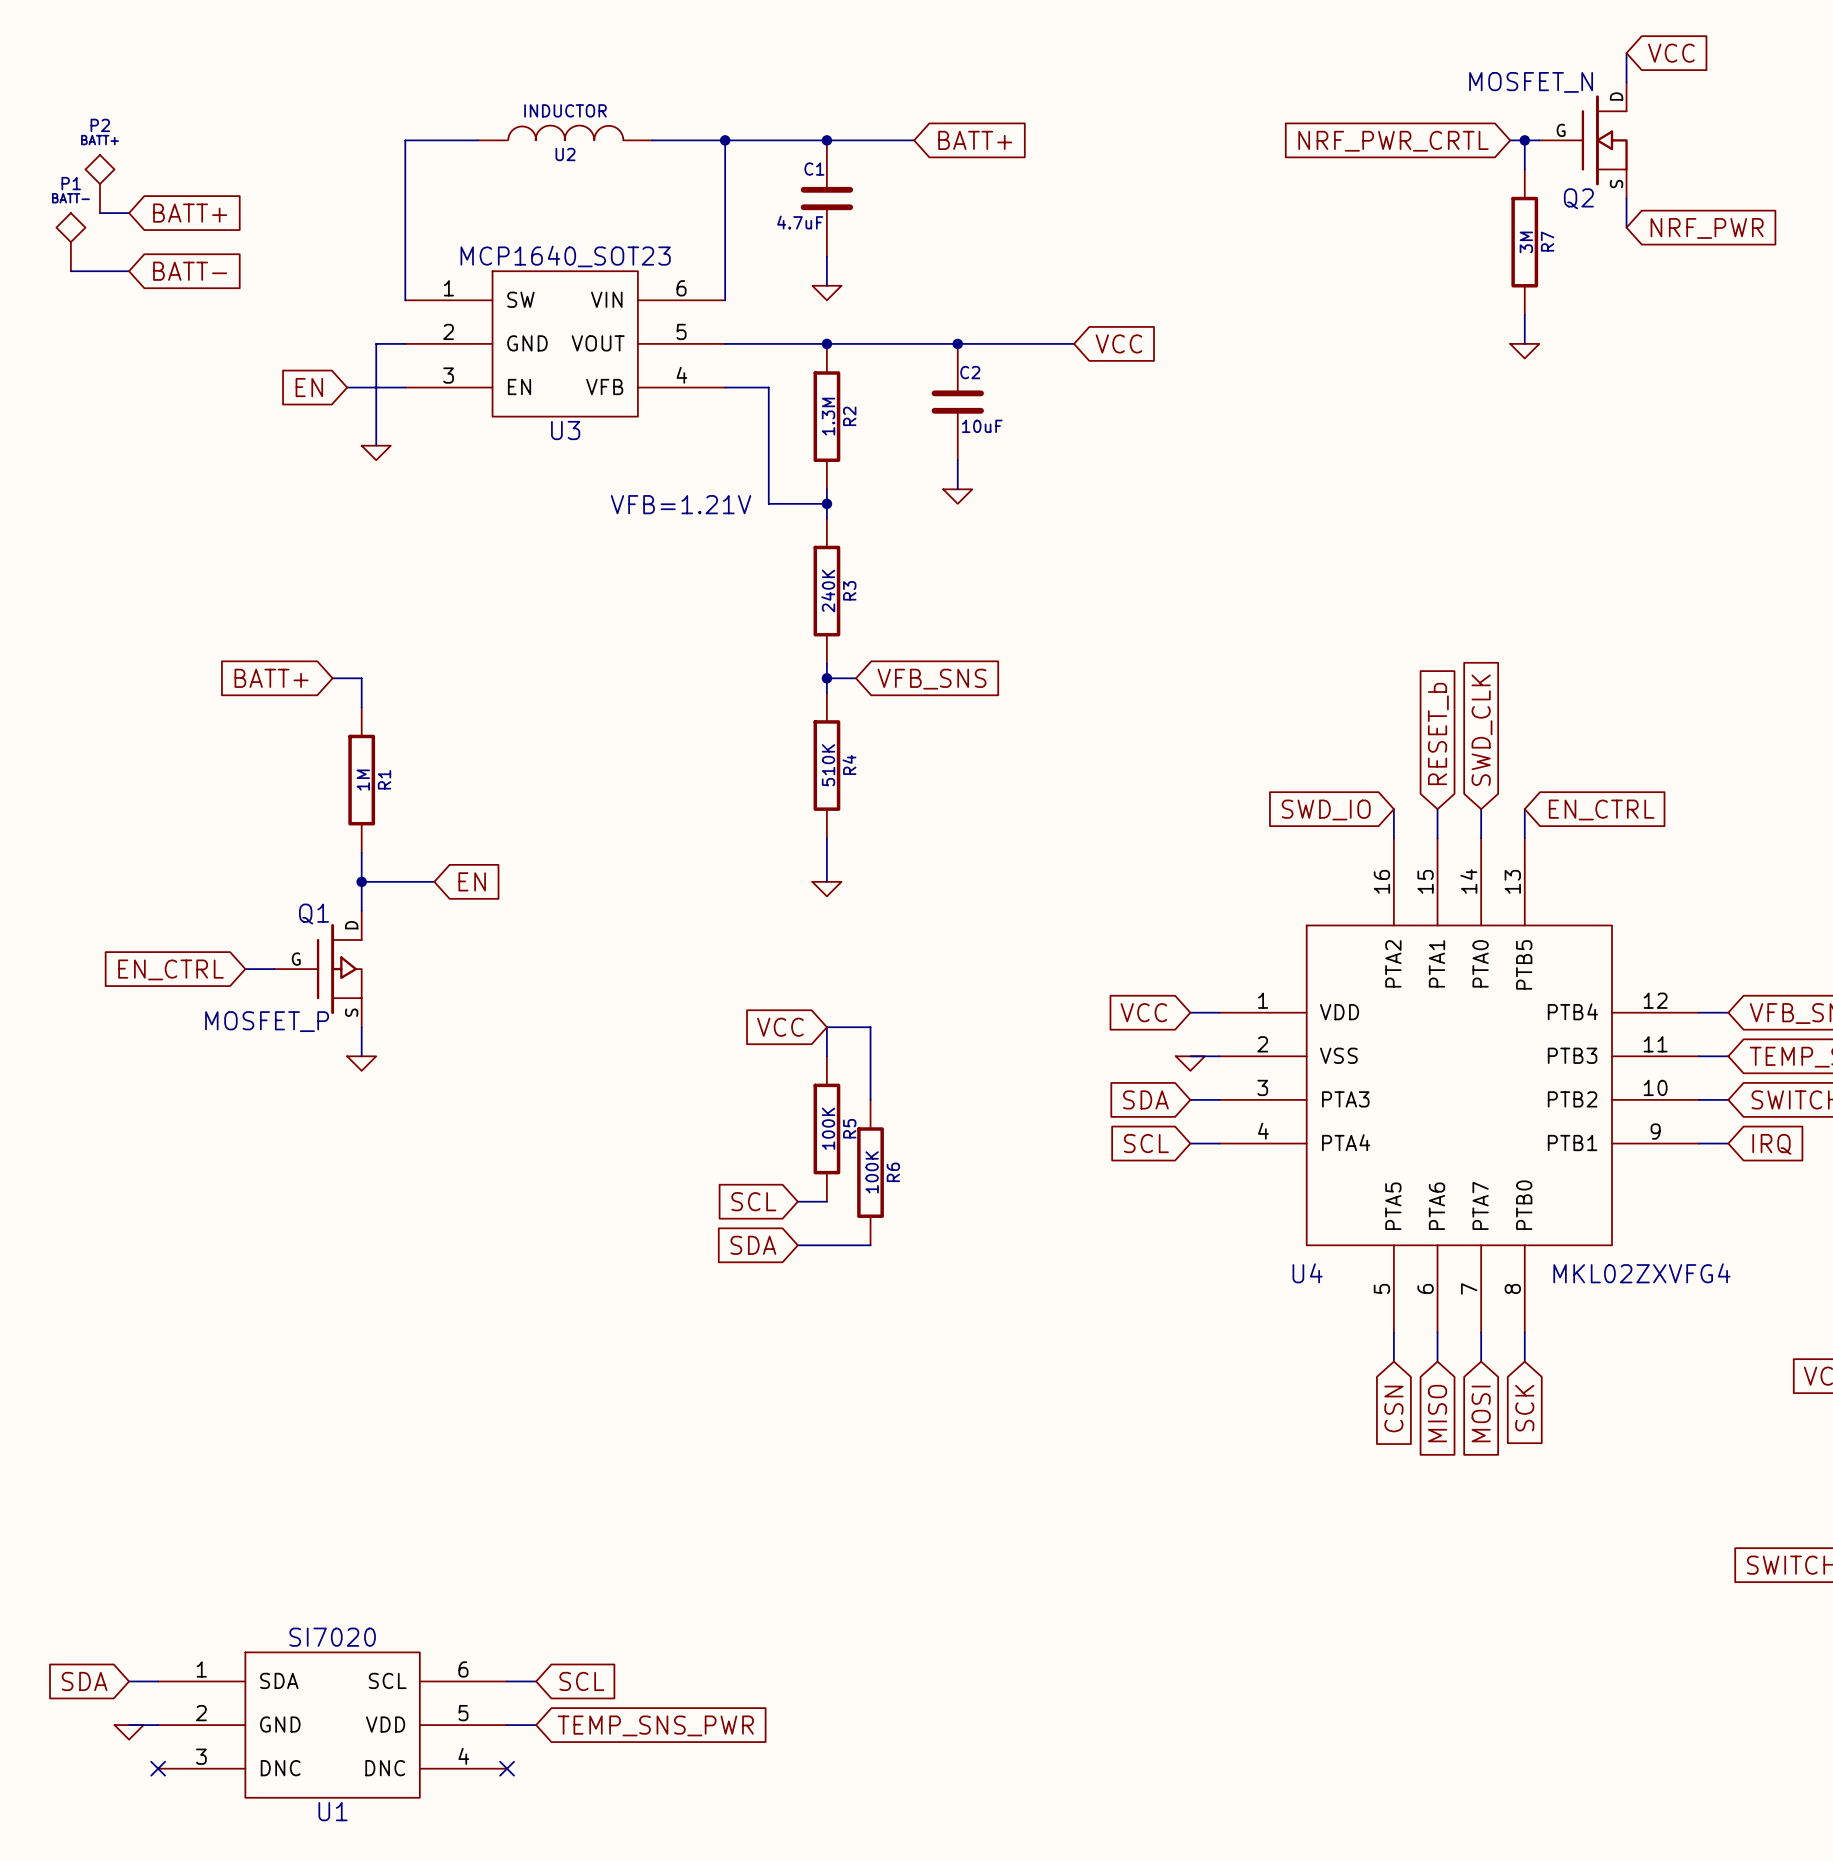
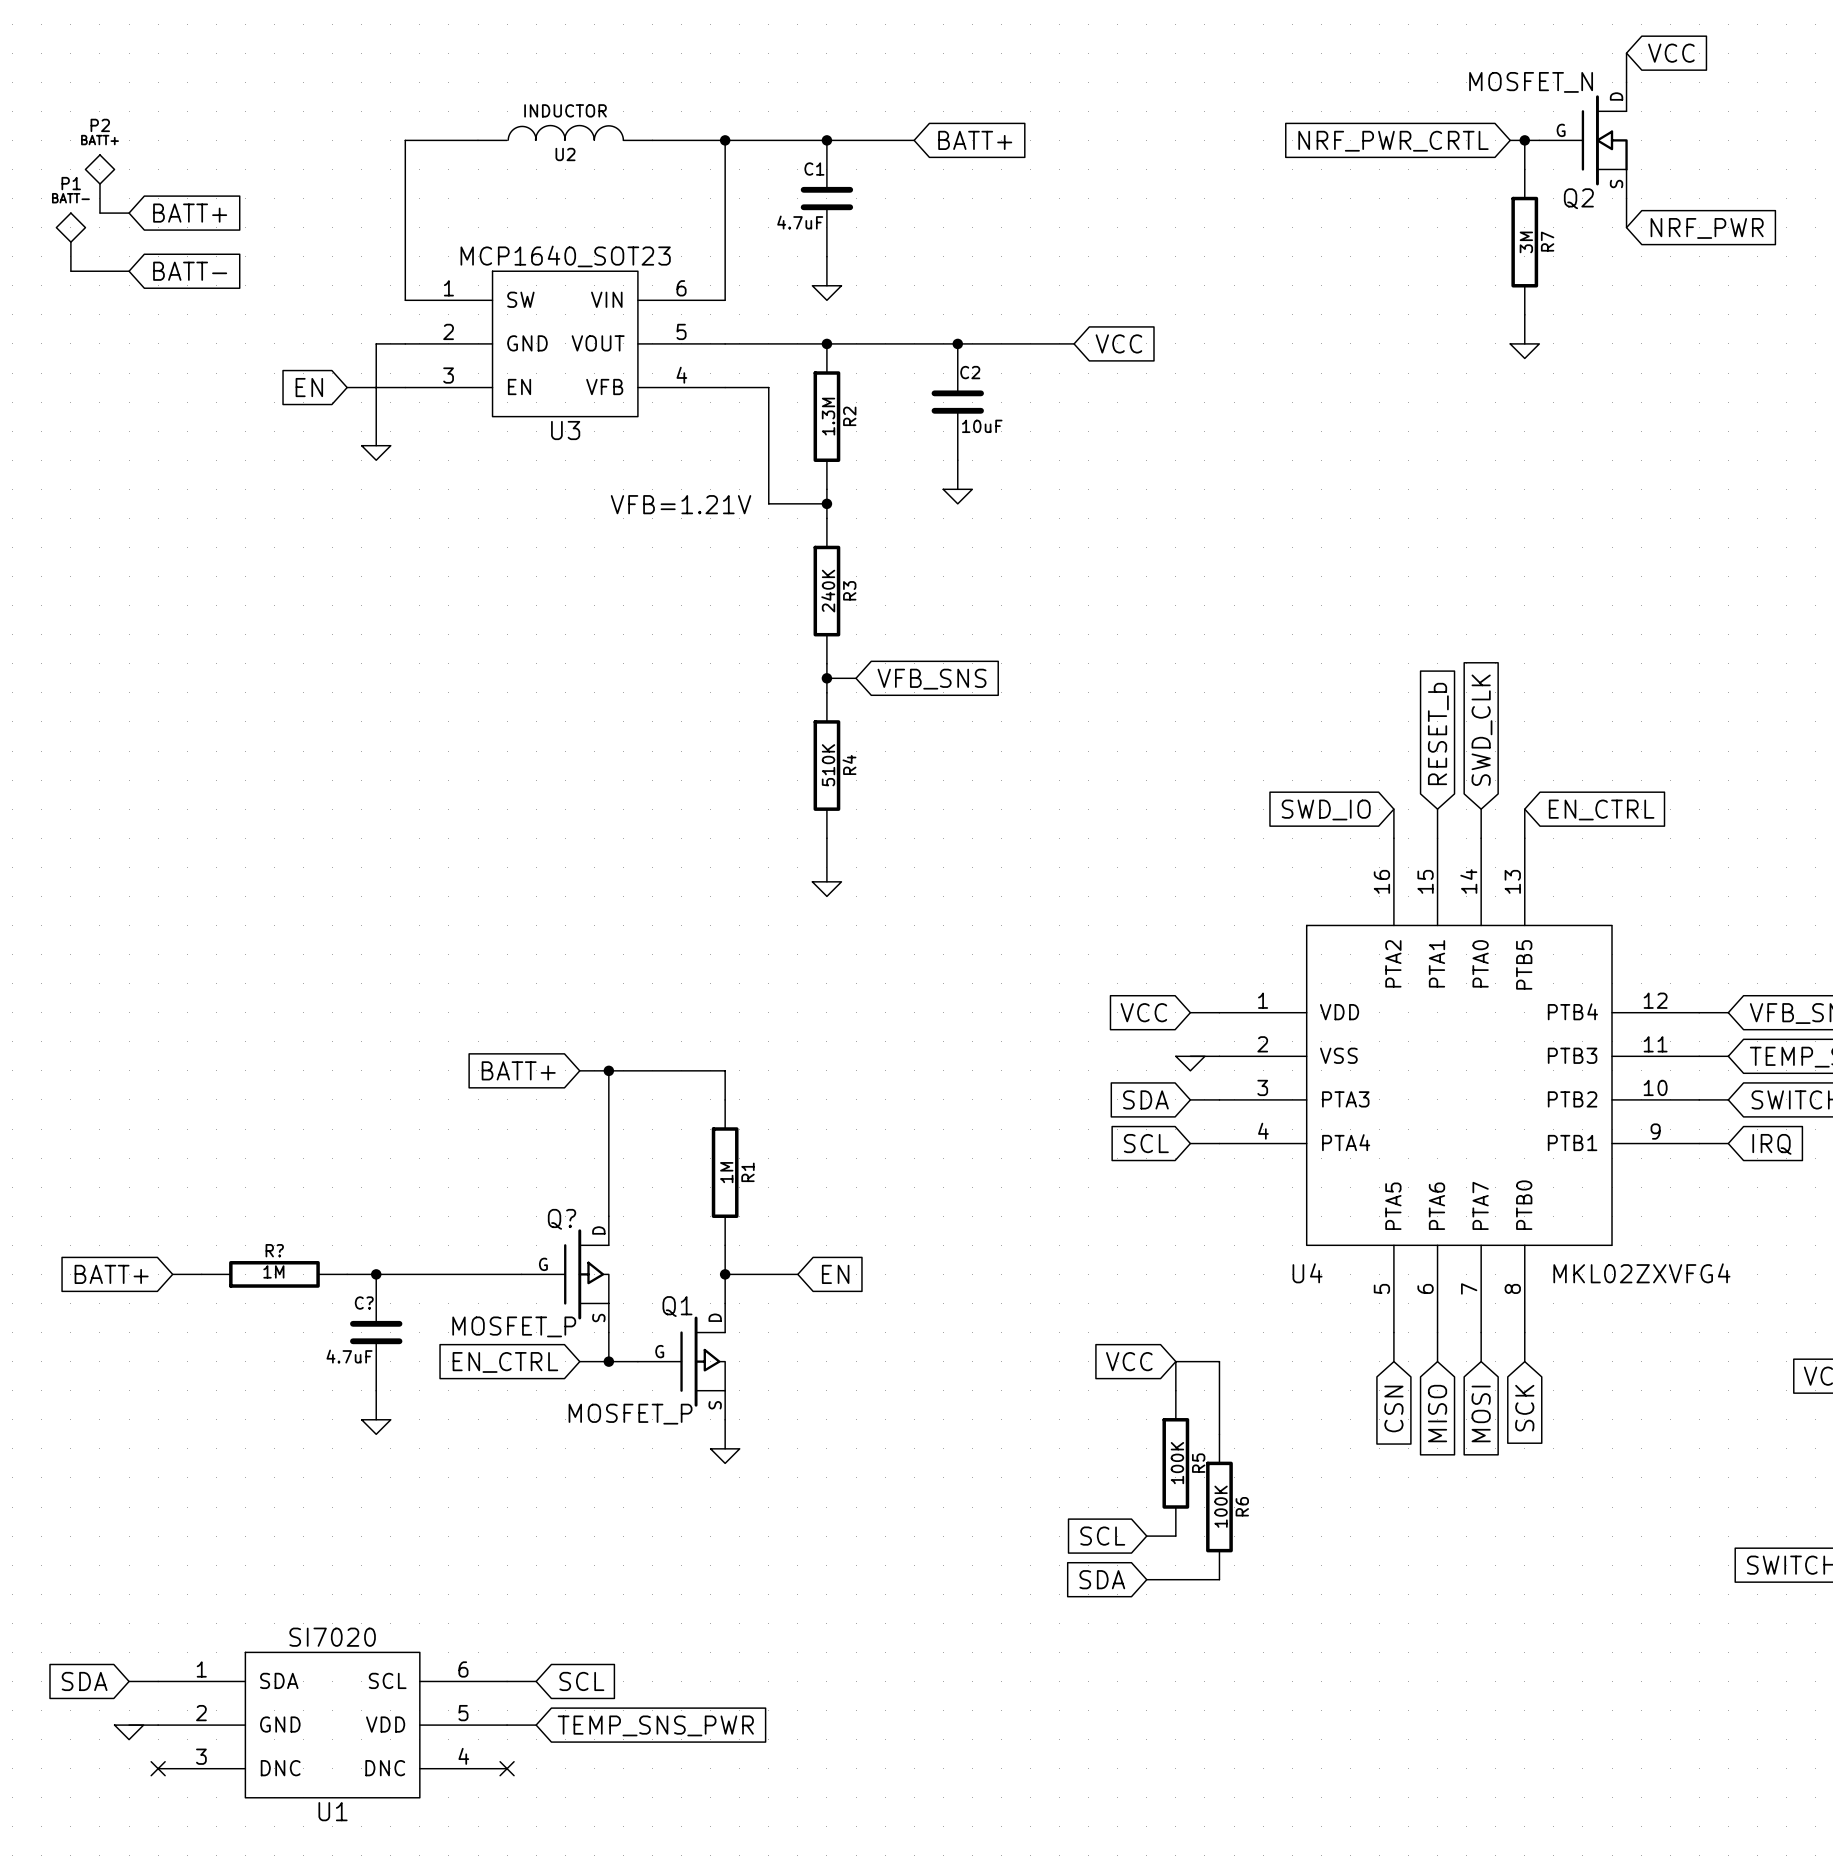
global label: BATT+ (271, 678) -> none
wire: (332, 678) (361, 678) (361, 707) -> none
R1 position: (361, 780) -> (725, 1172)
wire: (361, 852) (361, 910) -> none
wire: (361, 881) (434, 881) -> none
junction: (361, 881) -> none
global label: EN (472, 881) -> none
global label: EN_CTRL (171, 969) -> none
wire: (245, 969) (274, 969) -> none
Q1 position: (318, 969) -> (681, 1361)
wire: (361, 1027) (361, 1056) -> none
global label: VCC (780, 1027) -> none
wire: (826, 1056) (826, 1027) (870, 1027) (870, 1099) -> none
power symbol: (361, 1063) -> none
global label: none -> BATT+ (518, 1070)
wire: none -> (579, 1070) (725, 1070) (725, 1099)
wire: none -> (608, 1070) (608, 1216)
junction: none -> (608, 1070)
R5 position: (826, 1129) -> (1175, 1463)
R6 position: (870, 1172) -> (1219, 1507)
global label: SCL (753, 1201) -> none
wire: (797, 1201) (826, 1201) -> none
wire: none -> (725, 1245) (725, 1303)
global label: SDA (753, 1245) -> none
wire: (797, 1245) (870, 1245) -> (725, 1274) (797, 1274)
global label: none -> BATT+ (111, 1274)
wire: none -> (172, 1274) (201, 1274)
R?: none -> 1M (274, 1274)
wire: none -> (347, 1274) (521, 1274)
junction: none -> (376, 1274)
Q?: none -> MOSFET_P (565, 1274)
junction: none -> (725, 1274)
global label: none -> EN (835, 1274)
C?: none -> 4.7uF (376, 1332)
wire: none -> (608, 1332) (608, 1361)
wire: none -> (579, 1361) (637, 1361)
junction: none -> (608, 1361)
global label: none -> VCC (1129, 1361)
global label: none -> EN_CTRL (505, 1362)
wire: none -> (376, 1390) (376, 1419)
wire: none -> (1175, 1390) (1175, 1361) (1219, 1361) (1219, 1434)
wire: none -> (725, 1419) (725, 1448)
power symbol: none -> (376, 1427)
power symbol: none -> (725, 1456)
global label: none -> SCL (1102, 1536)
wire: none -> (1146, 1536) (1175, 1536)
global label: none -> SDA (1102, 1579)
wire: none -> (1146, 1579) (1219, 1579)

